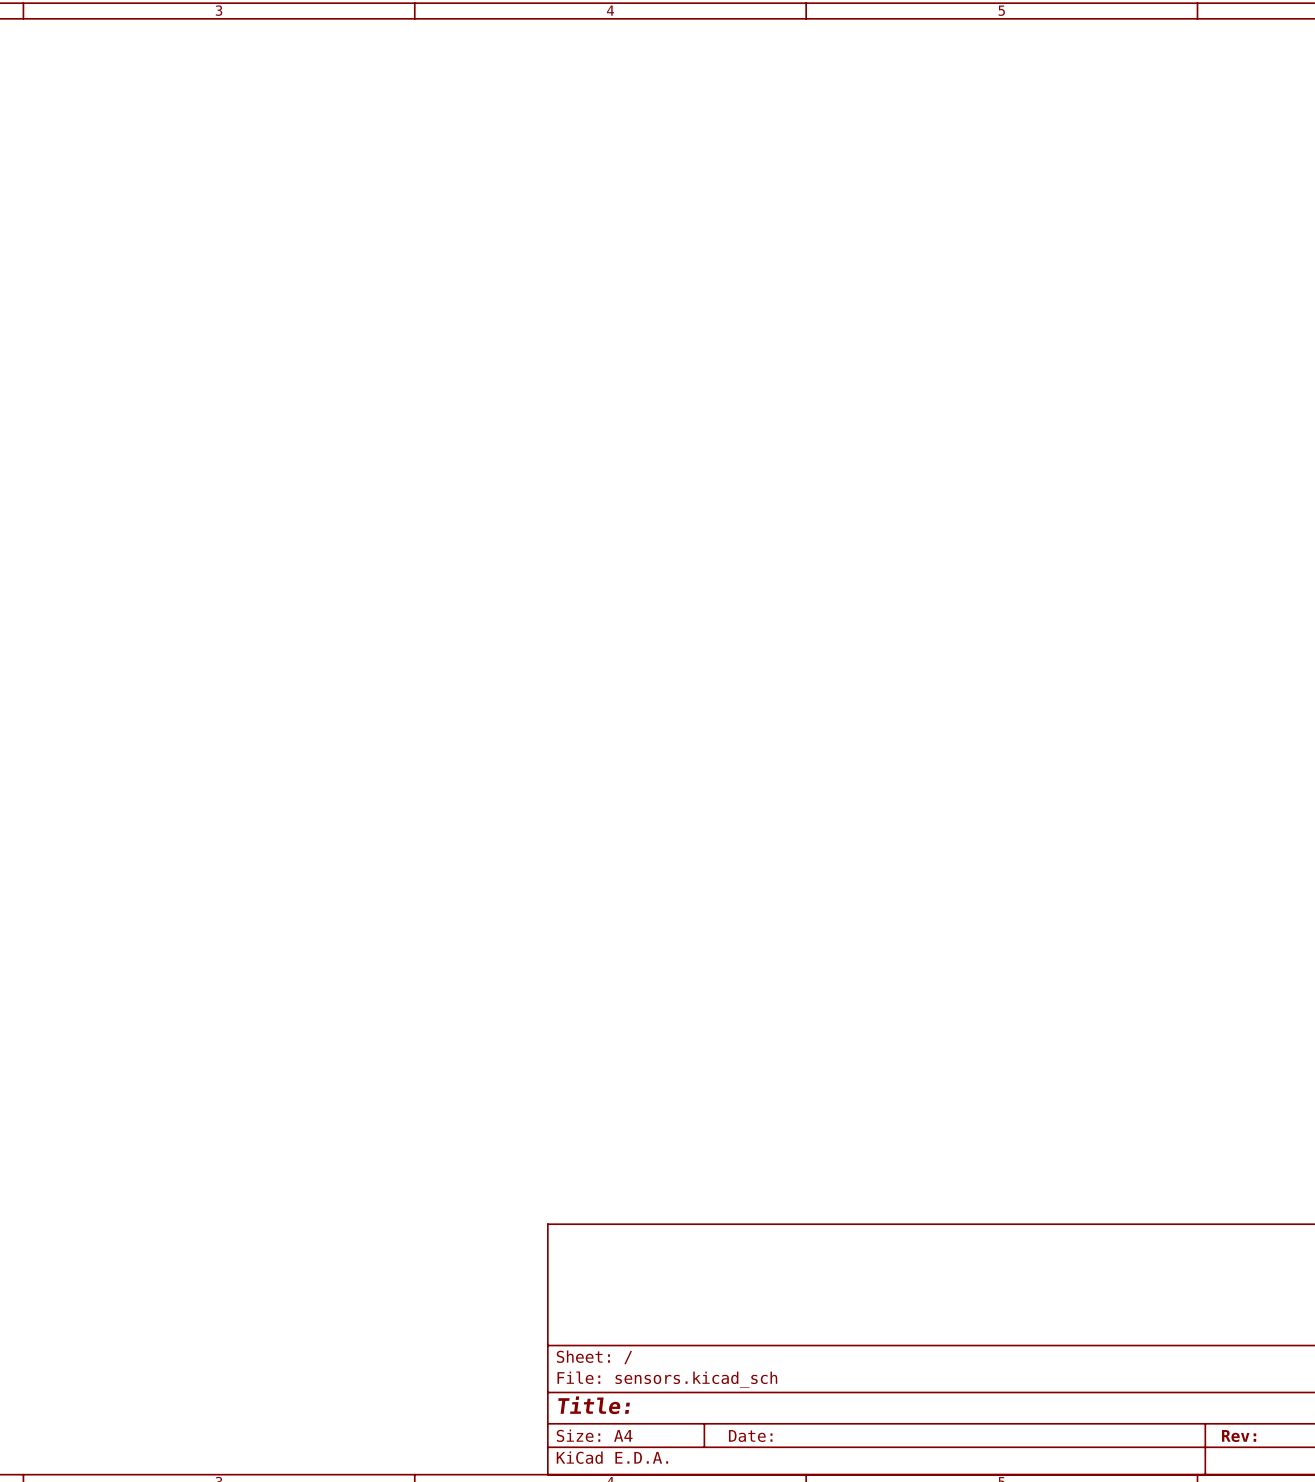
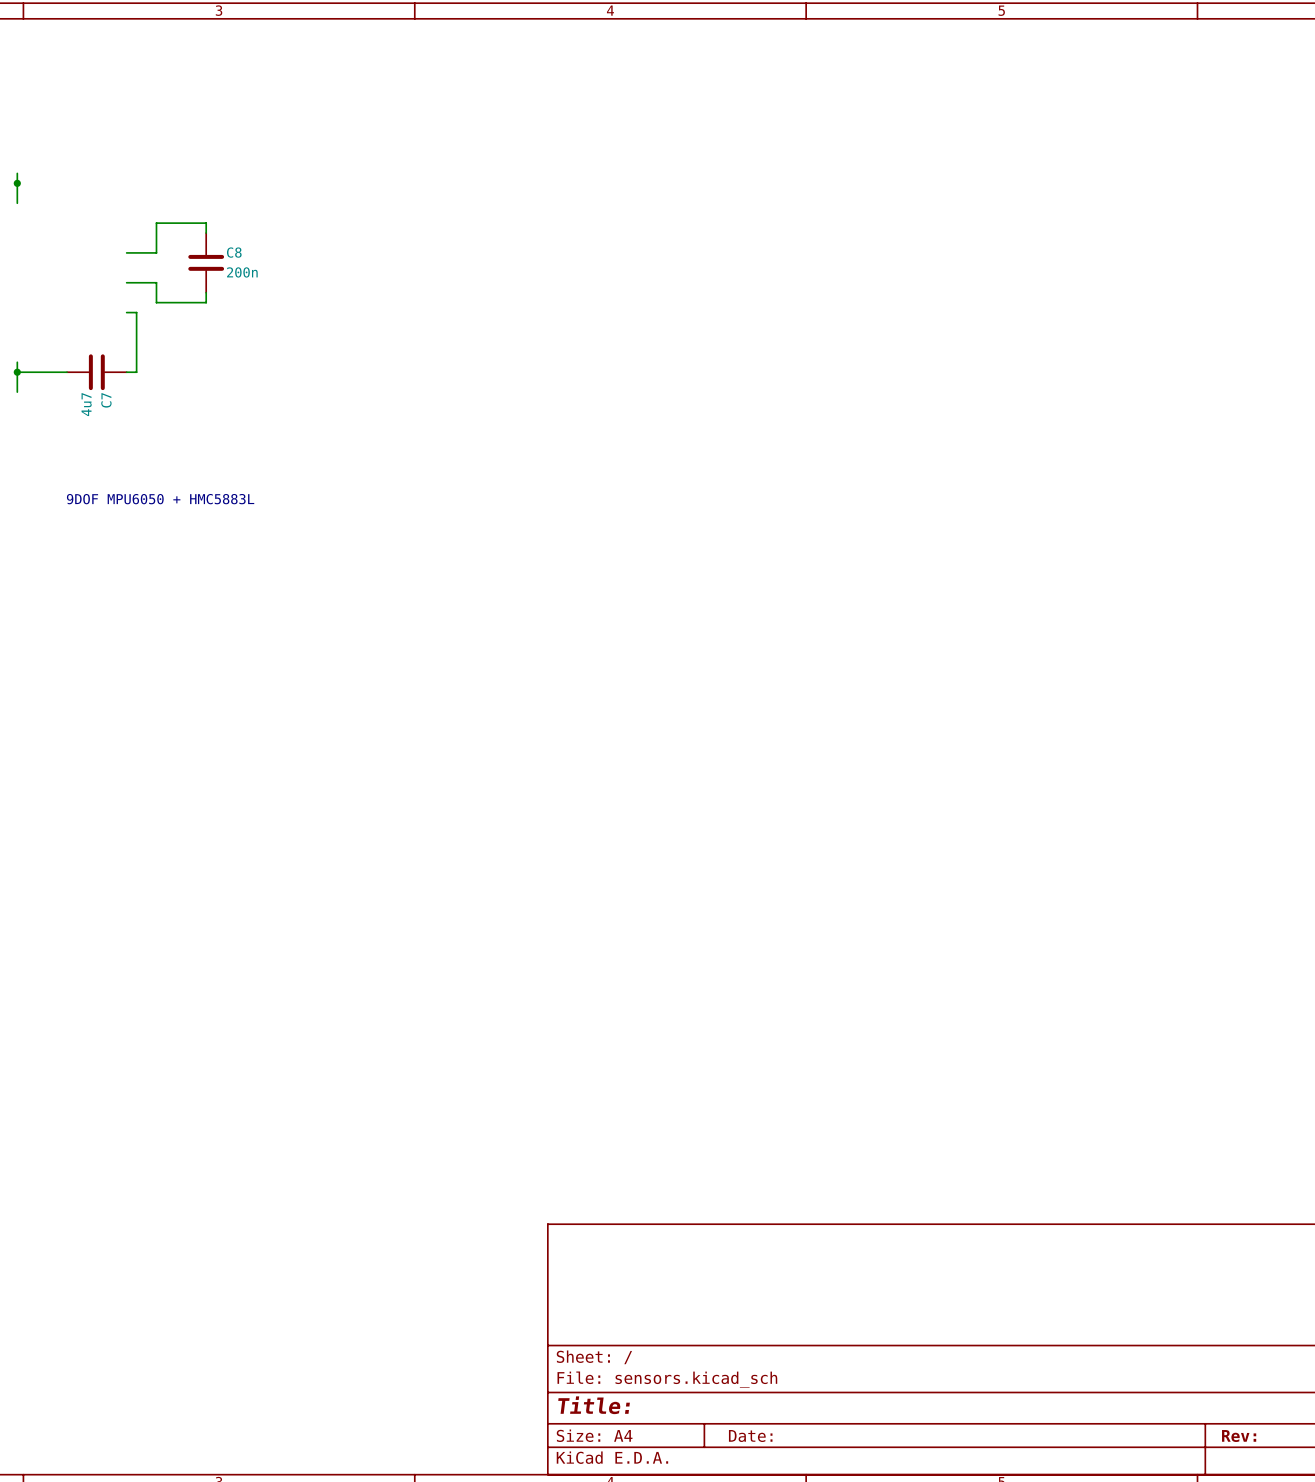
wire: none -> (17, 173) (17, 203)
junction: none -> (17, 183)
wire: none -> (206, 233) (206, 223) (156, 223) (156, 252) (126, 252)
C8: none -> 200n (206, 262)
wire: none -> (126, 282) (156, 282) (156, 302) (206, 302) (206, 292)
wire: none -> (126, 312) (136, 312) (136, 372) (126, 372)
wire: none -> (17, 362) (17, 392)
wire: none -> (17, 372) (67, 372)
junction: none -> (17, 372)
C7: none -> 4u7 (96, 372)
text: none -> 9DOF MPU6050 + HMC5883L (160, 499)

